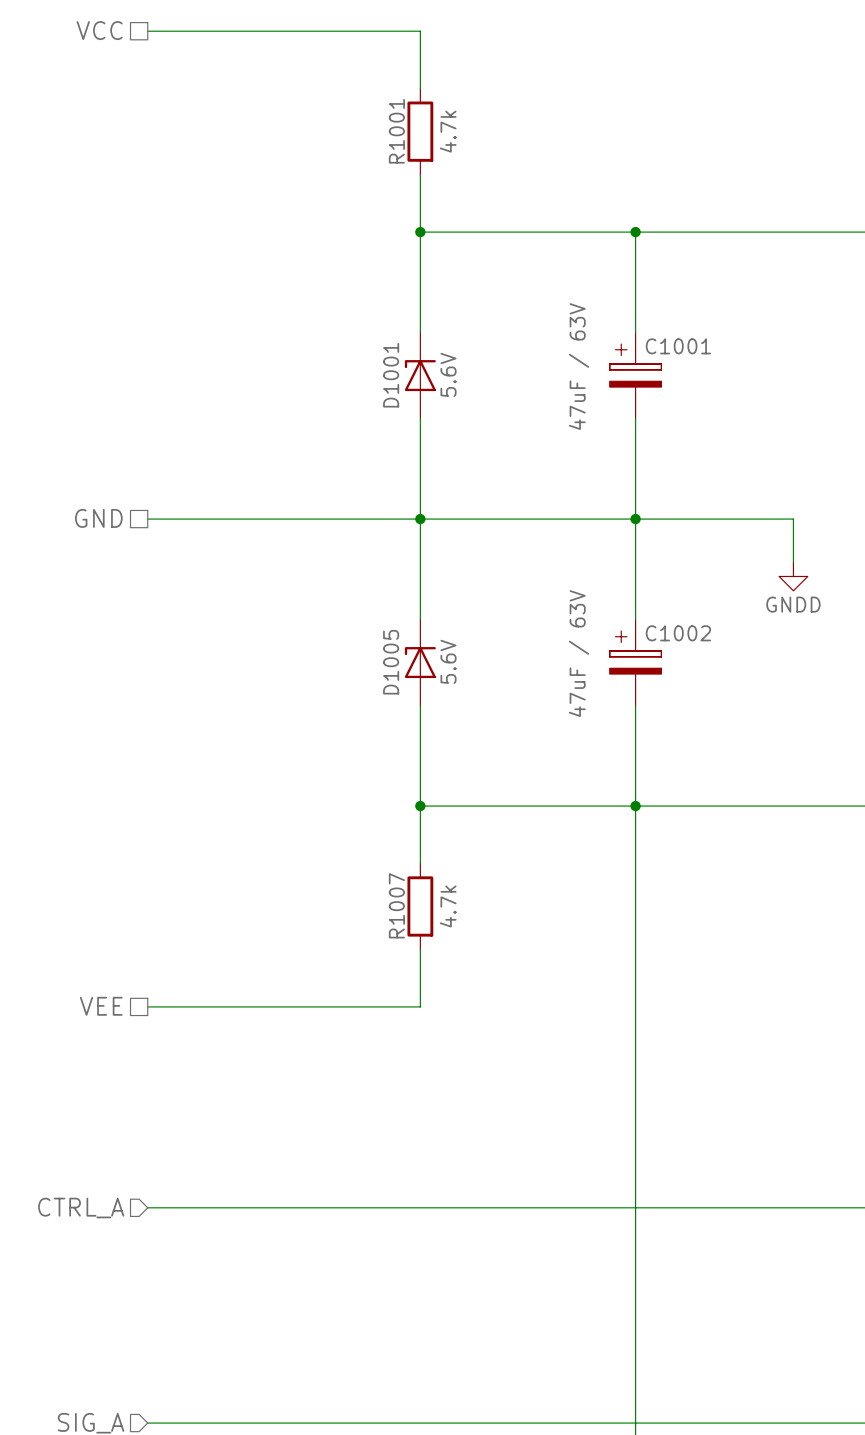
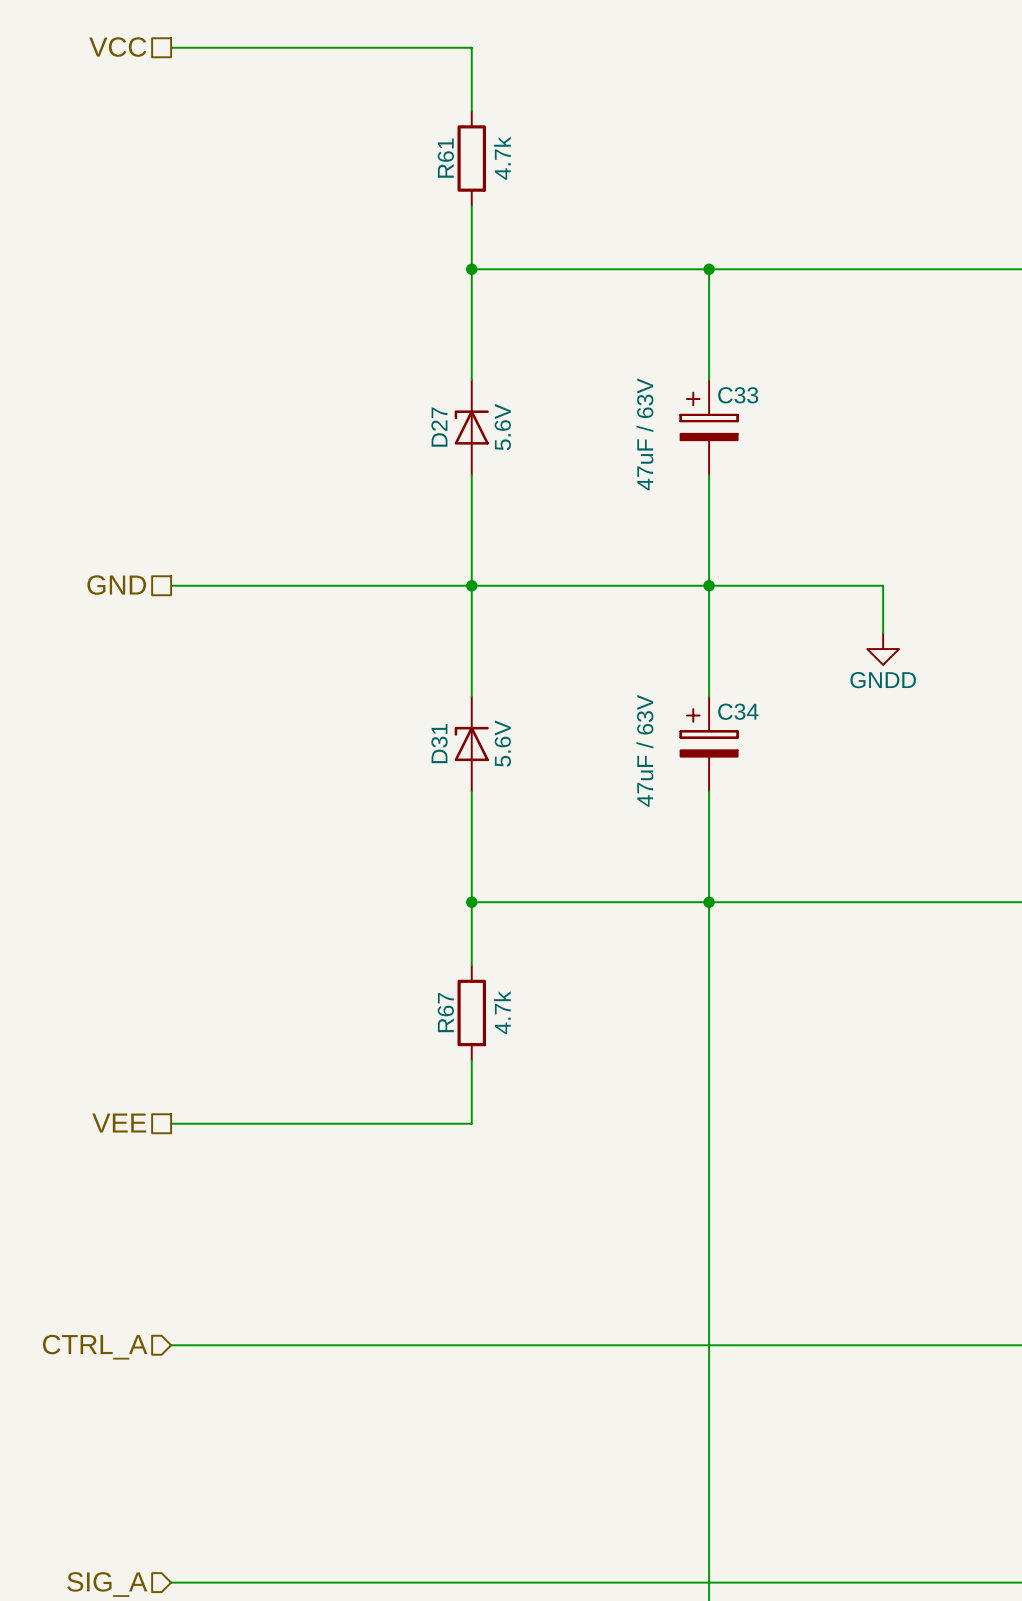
R1001 name: R1001 (396, 131) -> R61 (445, 158)
C1001 name: C1001 (678, 346) -> C33 (738, 395)
D1001 name: D1001 (391, 375) -> D27 (439, 427)
C1002 name: C1002 (678, 633) -> C34 (738, 711)
D1005 name: D1005 (391, 662) -> D31 (439, 743)
R1007 name: R1007 (396, 905) -> R67 (445, 1012)

